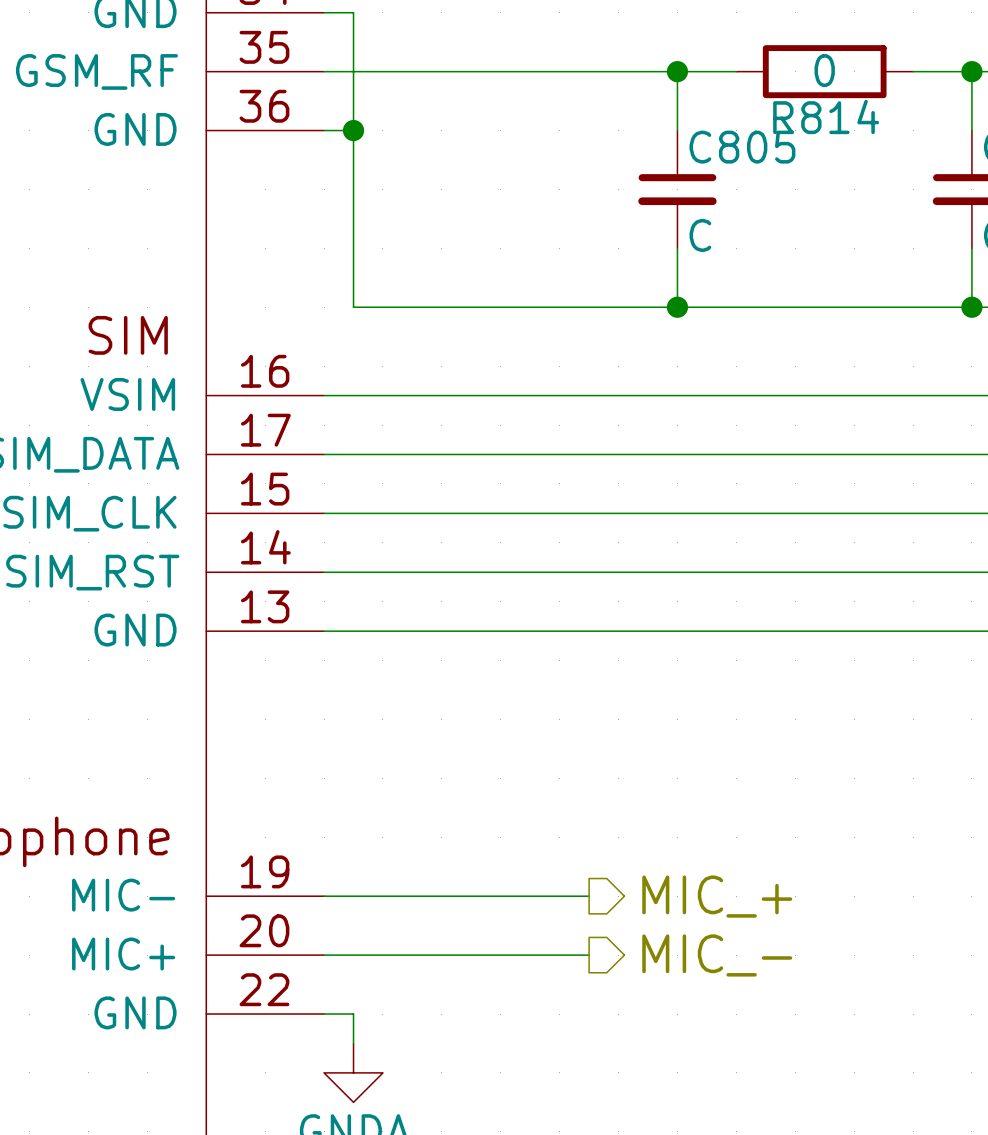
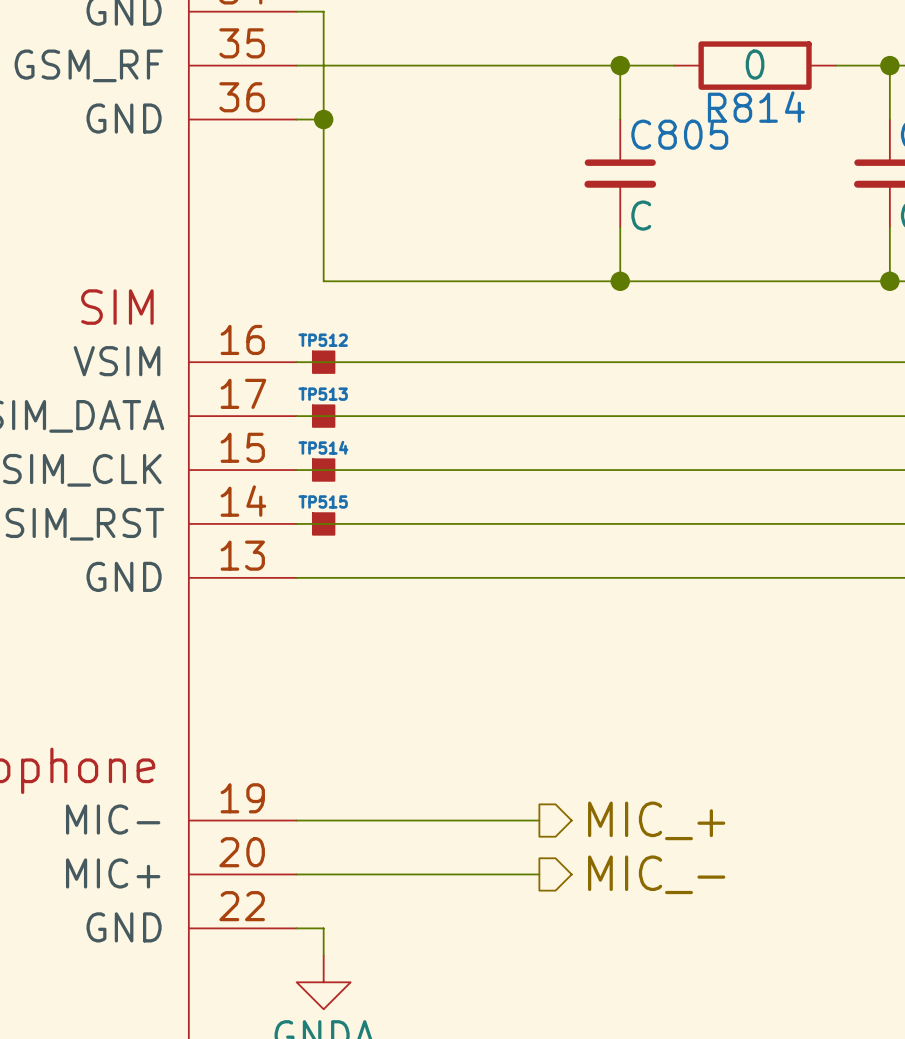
TP512: none -> (323, 362)
TP513: none -> (323, 416)
TP514: none -> (323, 470)
TP515: none -> (323, 523)

